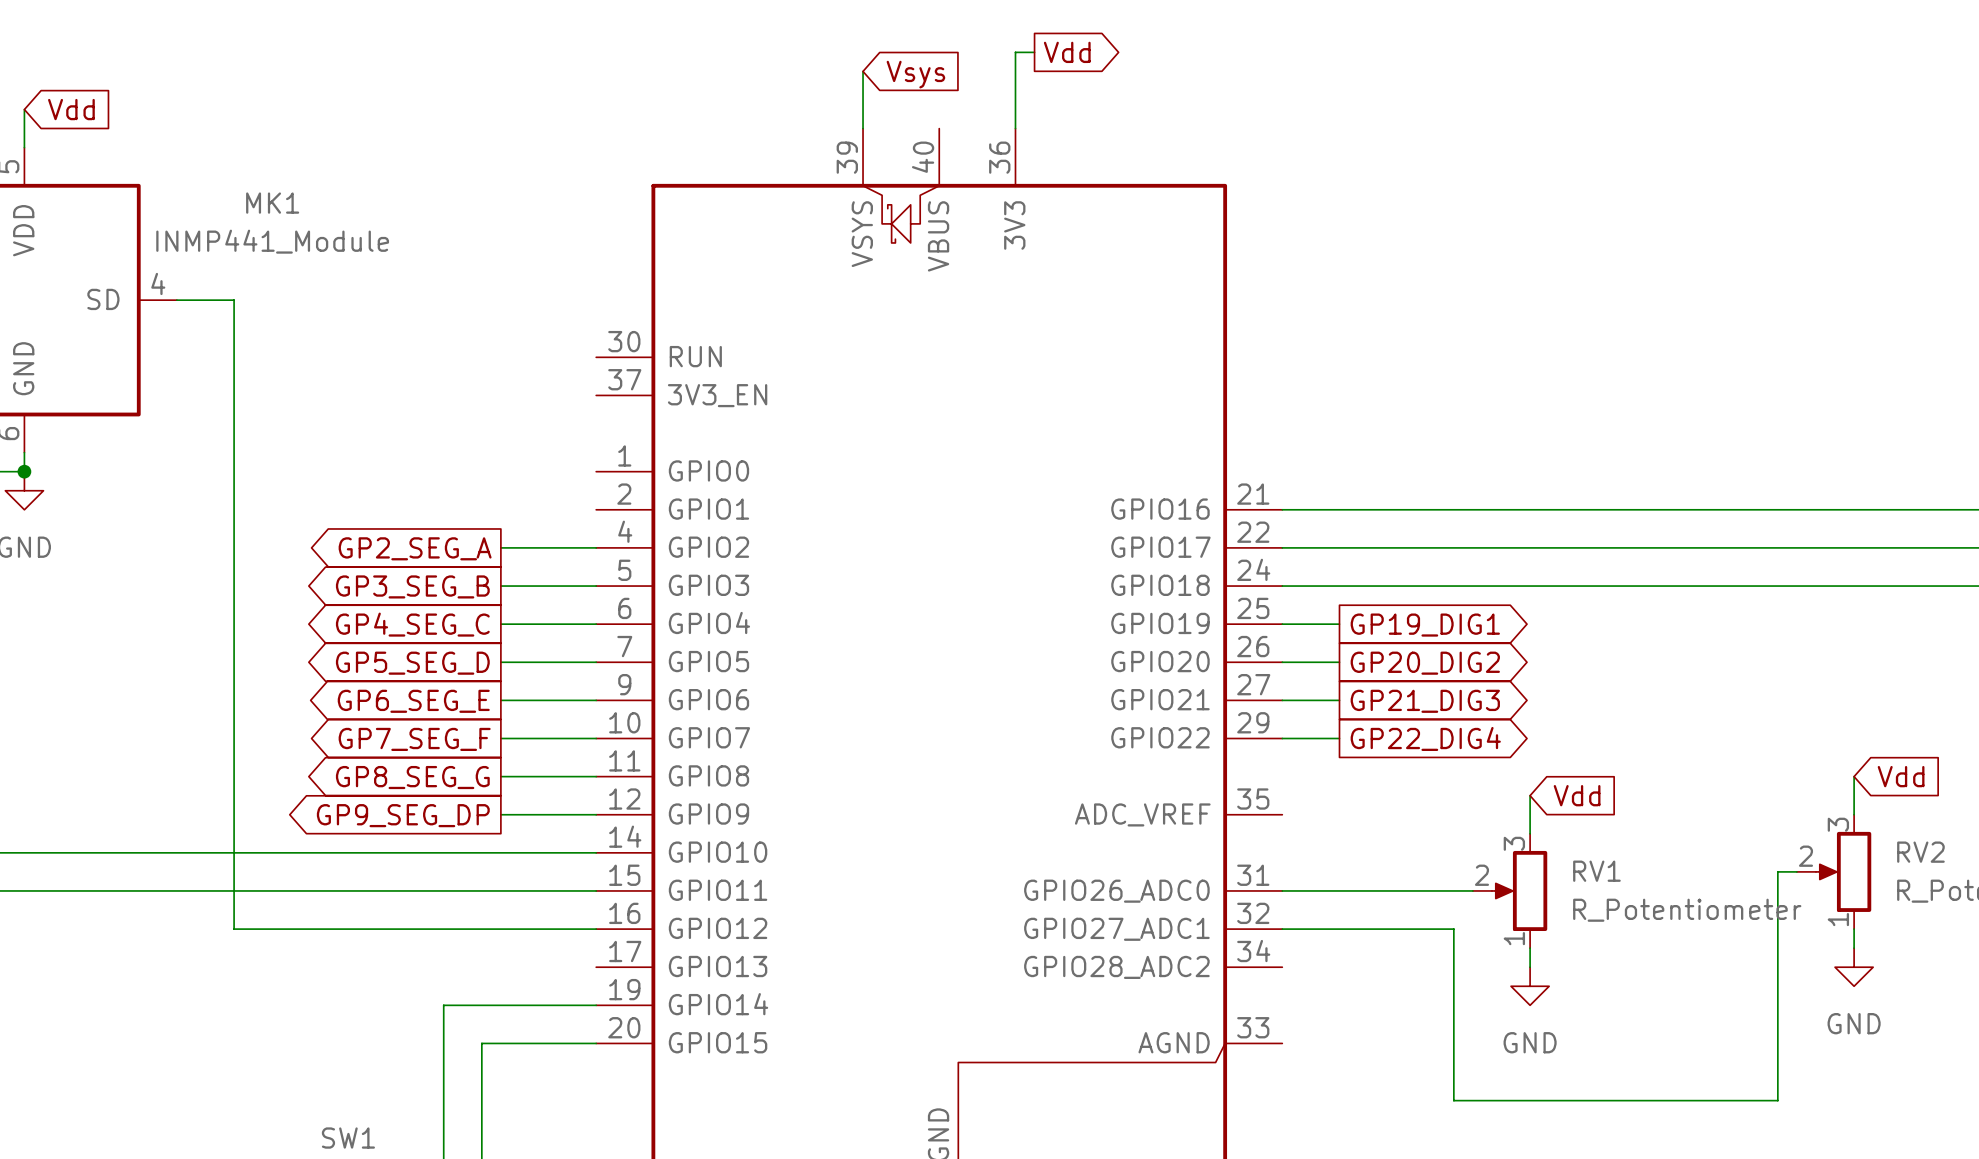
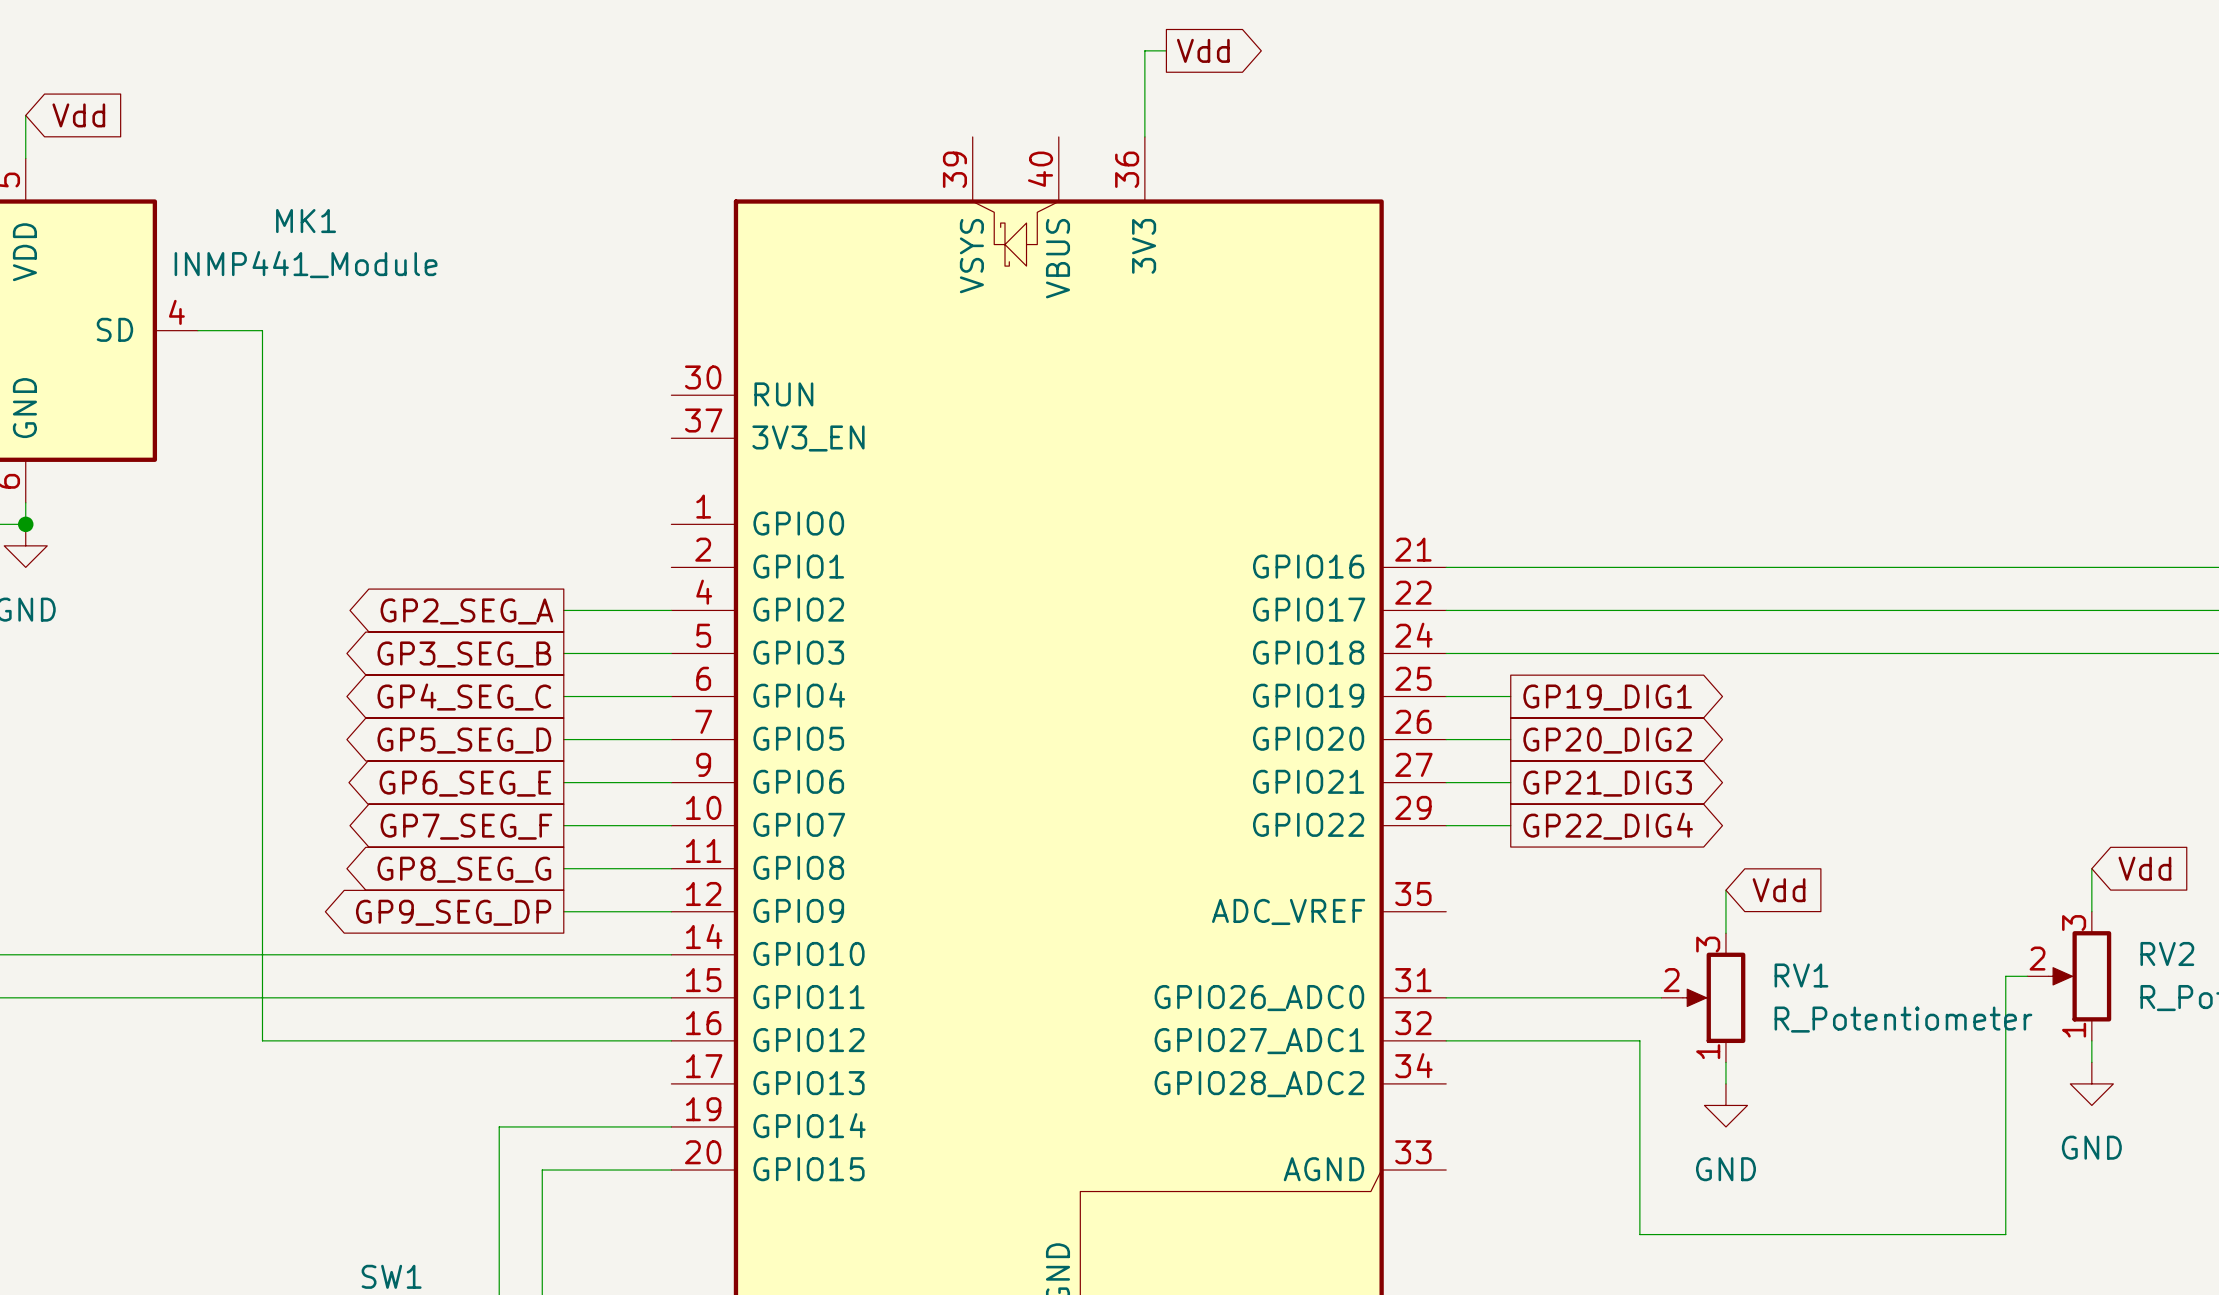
wire: (863, 71) (863, 128) -> none
global label: Vsys (915, 74) -> none

